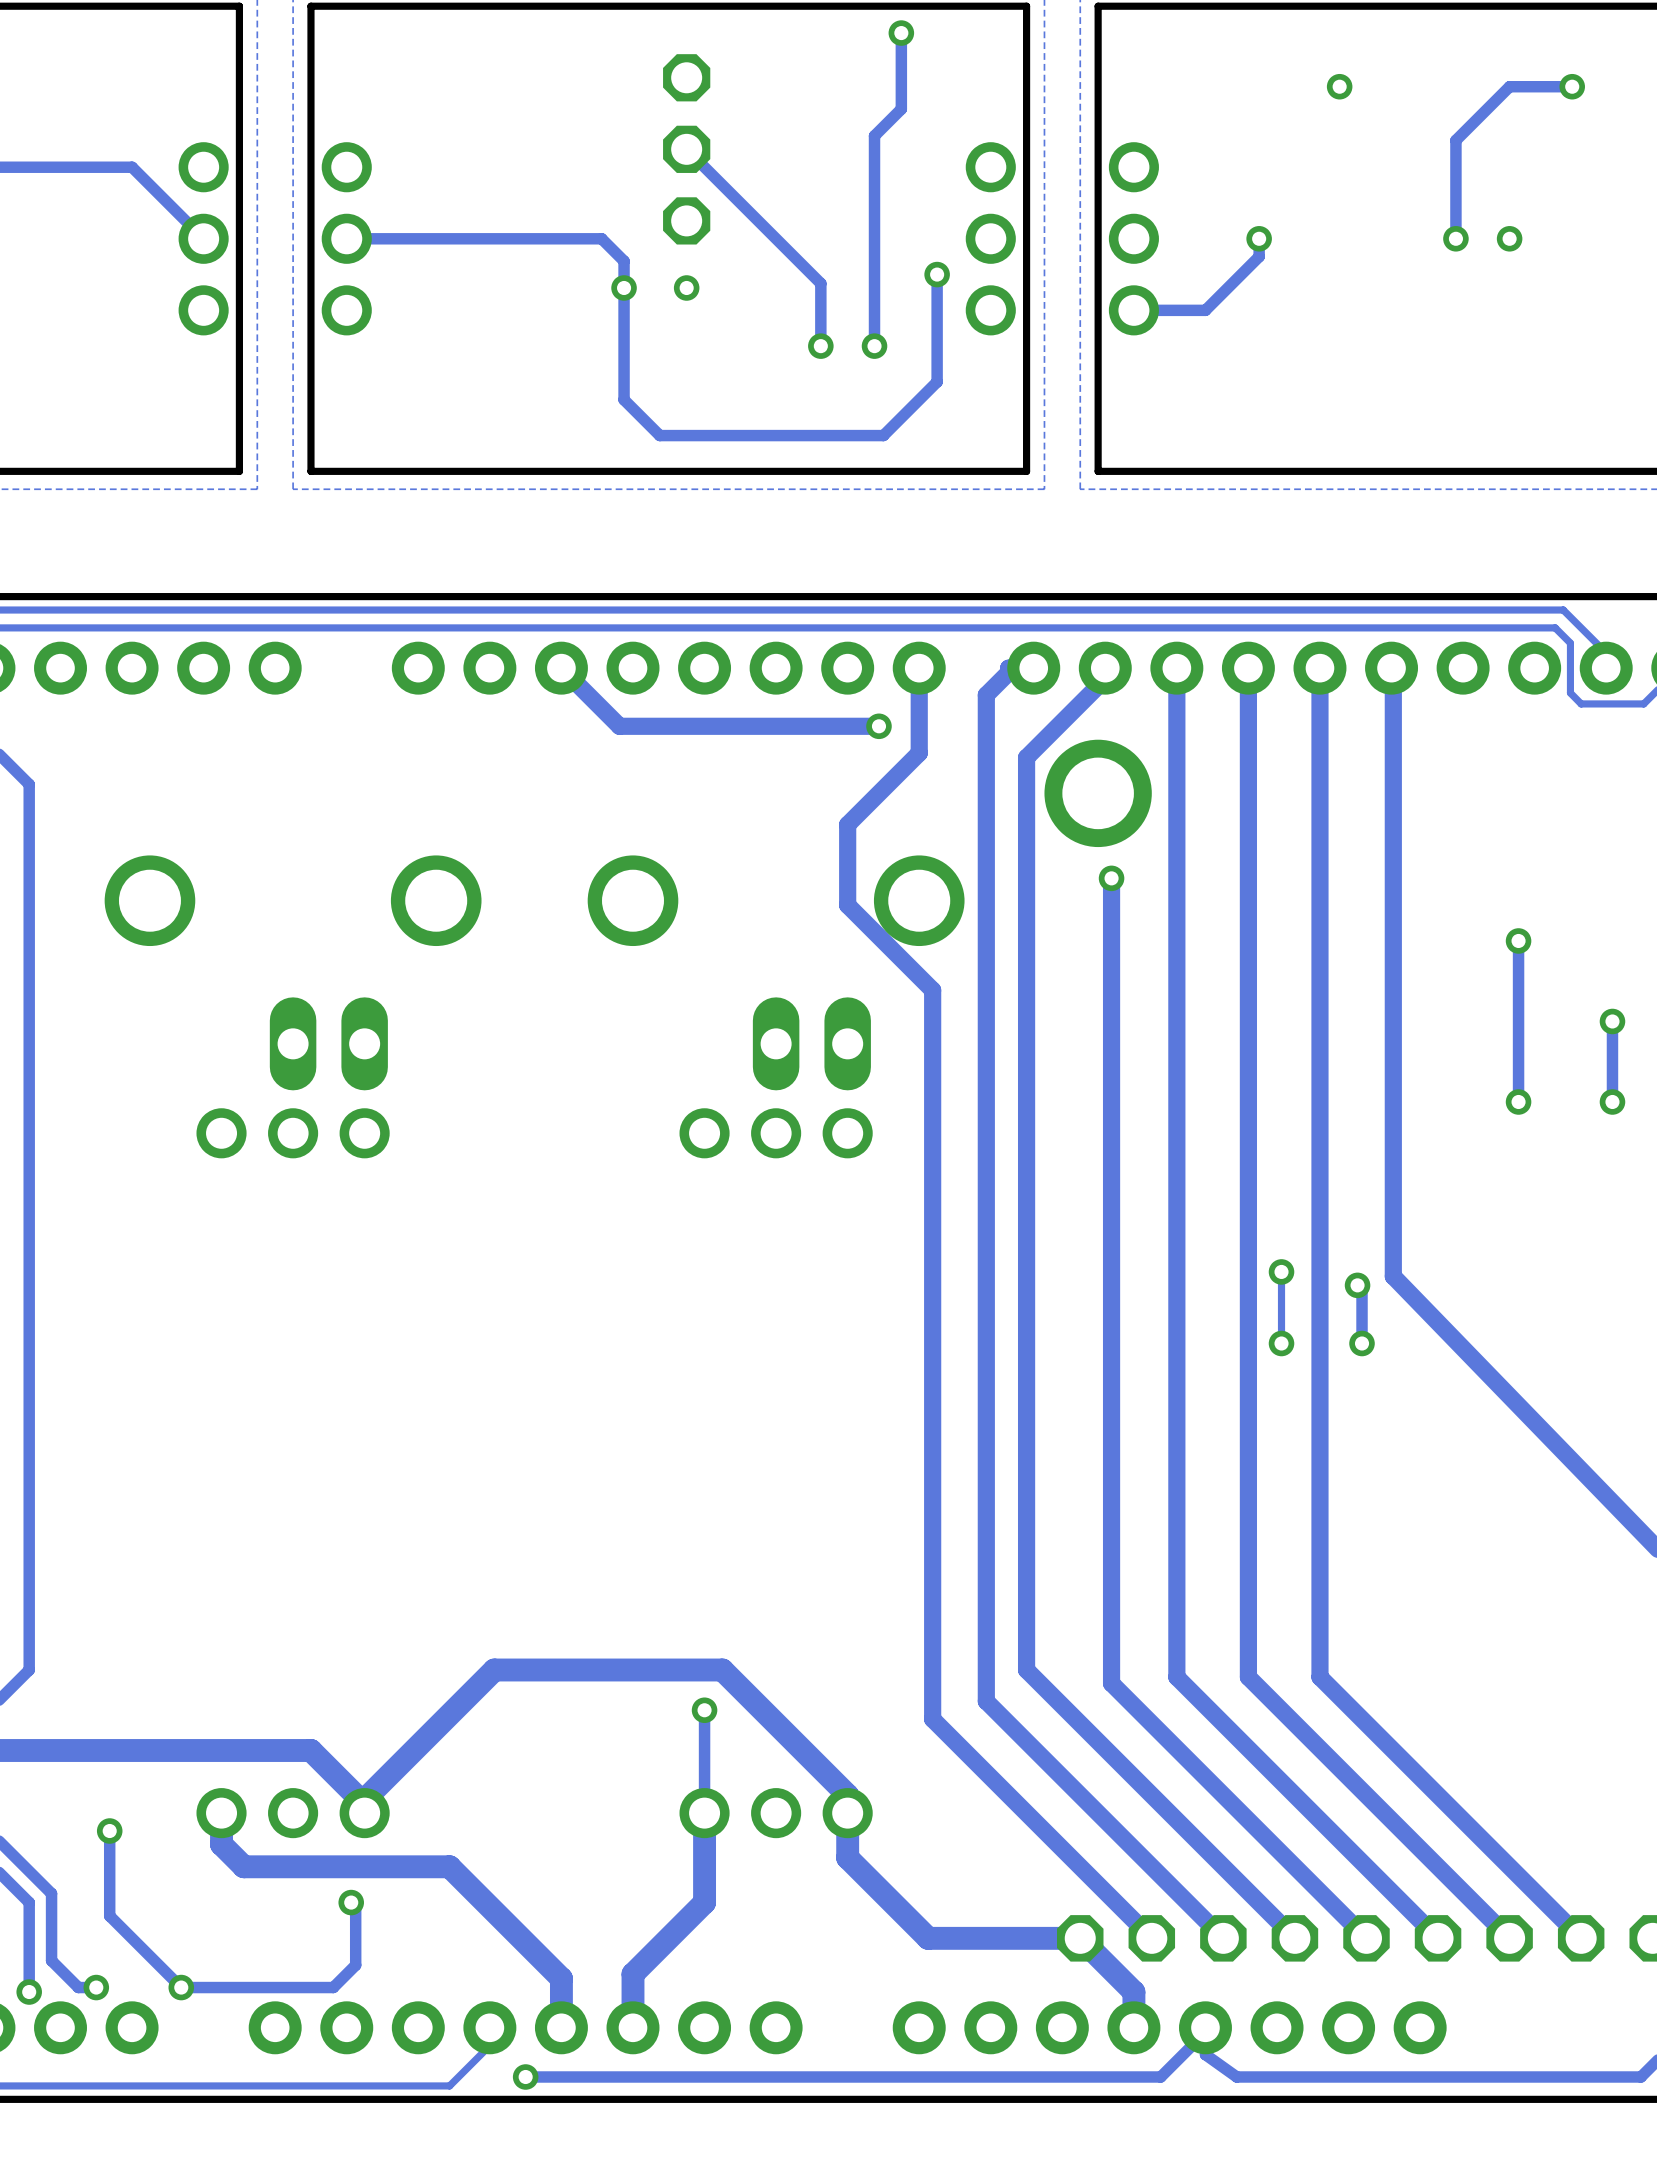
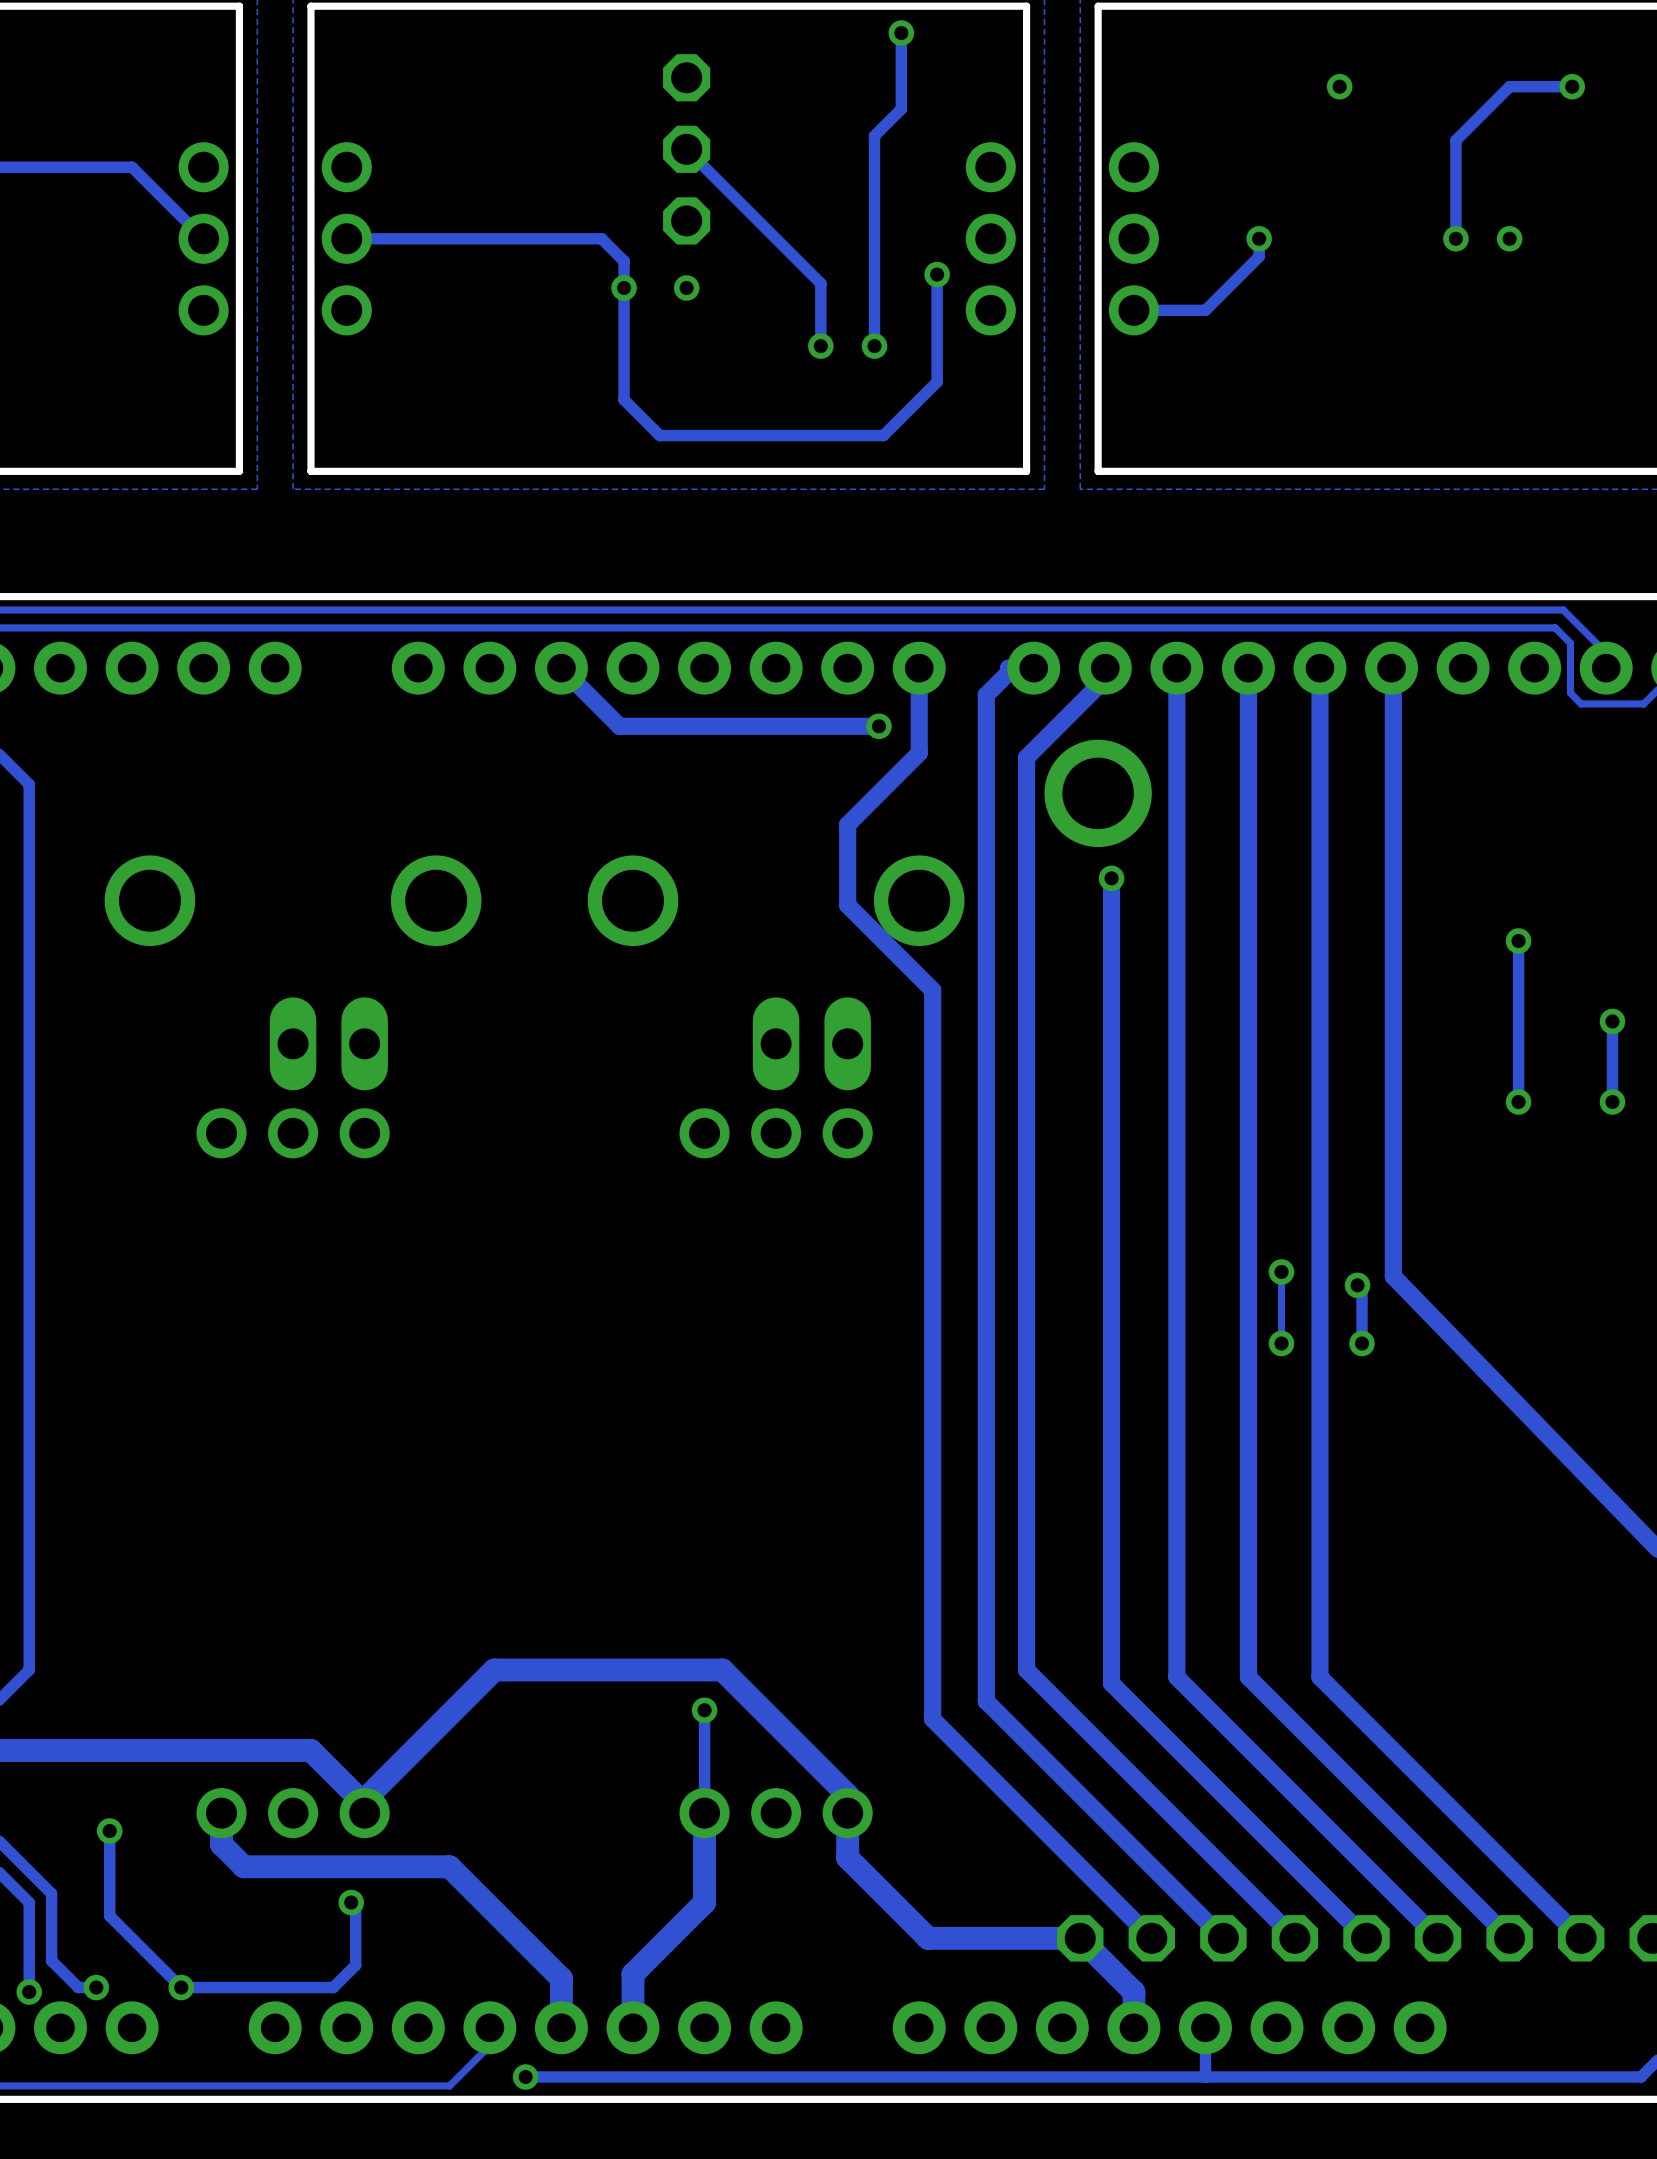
track: (1205, 2032) (1160, 2077) -> (1236, 2077) (1160, 2077)
track: (1205, 2054) (1236, 2077) -> (1205, 2054) (1205, 2077)

